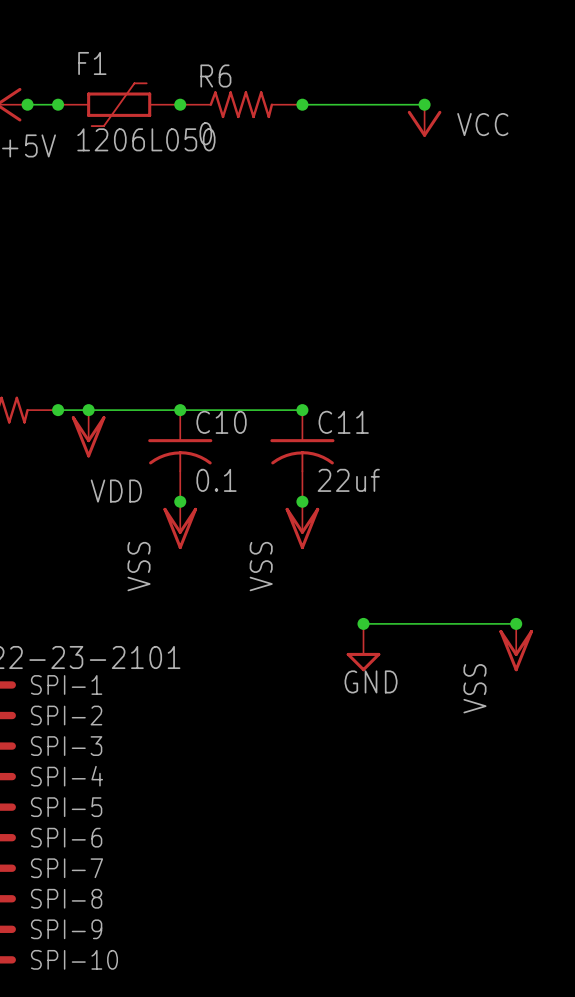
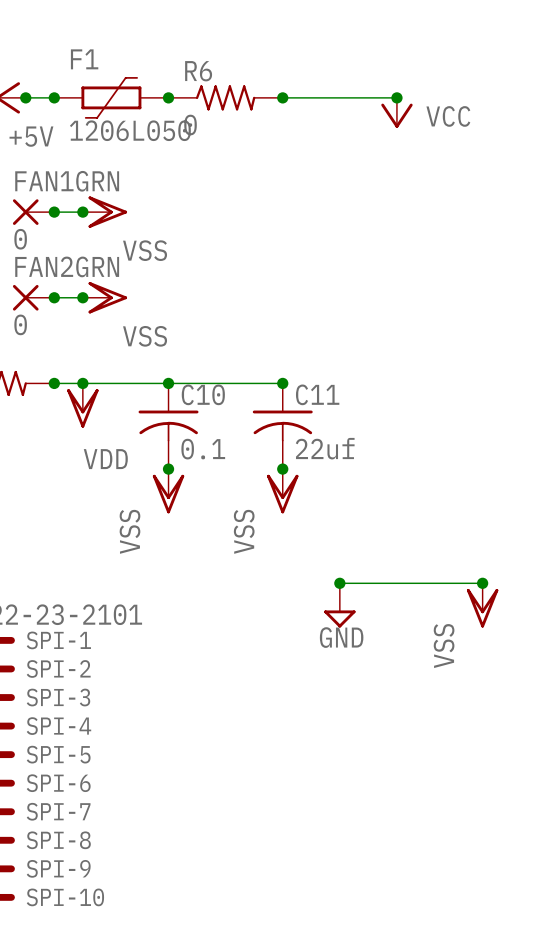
FAN1GRN: none -> 0 (33, 212)
wire: none -> (54, 212) (82, 212)
junction: none -> (54, 212)
junction: none -> (82, 212)
power symbol: none -> VSS (104, 212)
FAN2GRN: none -> 0 (33, 297)
wire: none -> (54, 297) (82, 297)
junction: none -> (54, 297)
junction: none -> (82, 297)
power symbol: none -> VSS (104, 297)

